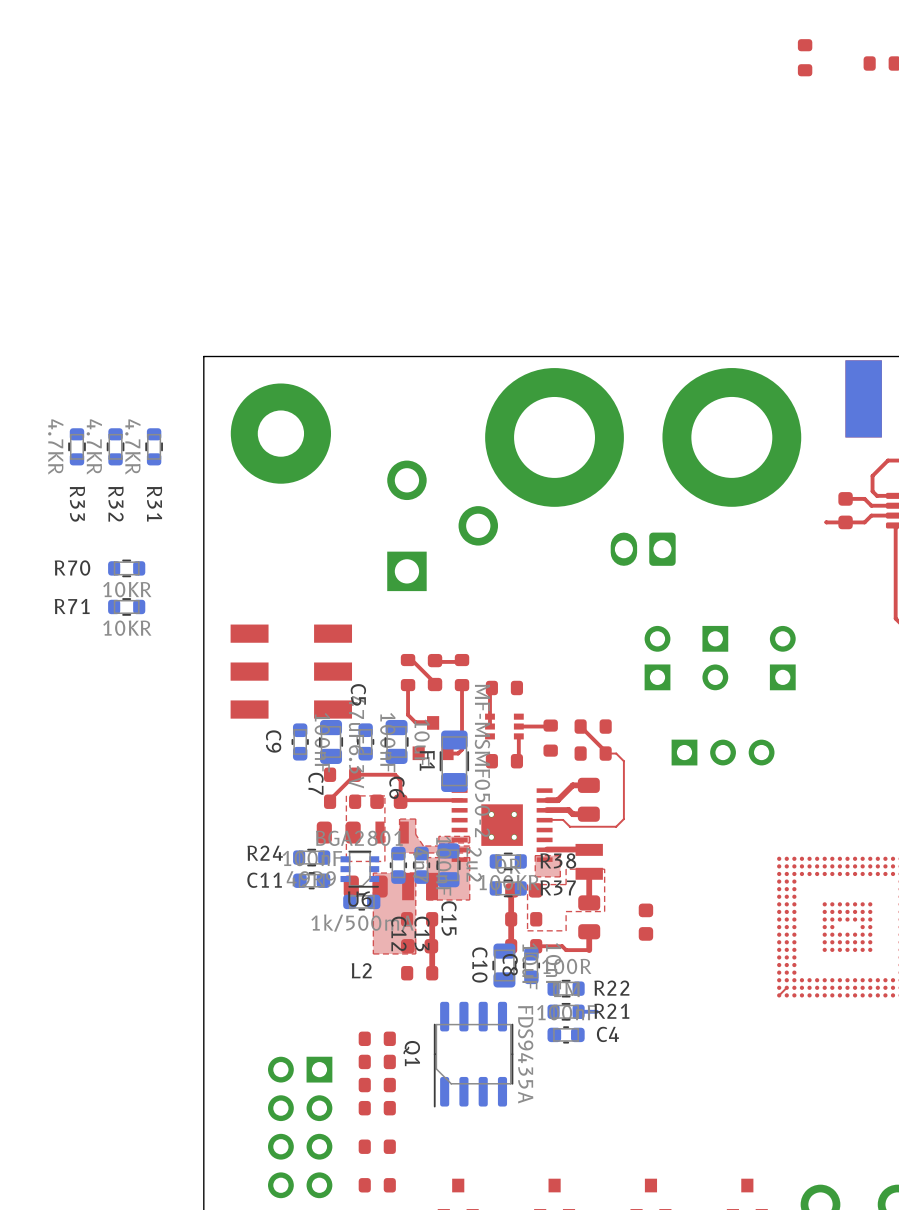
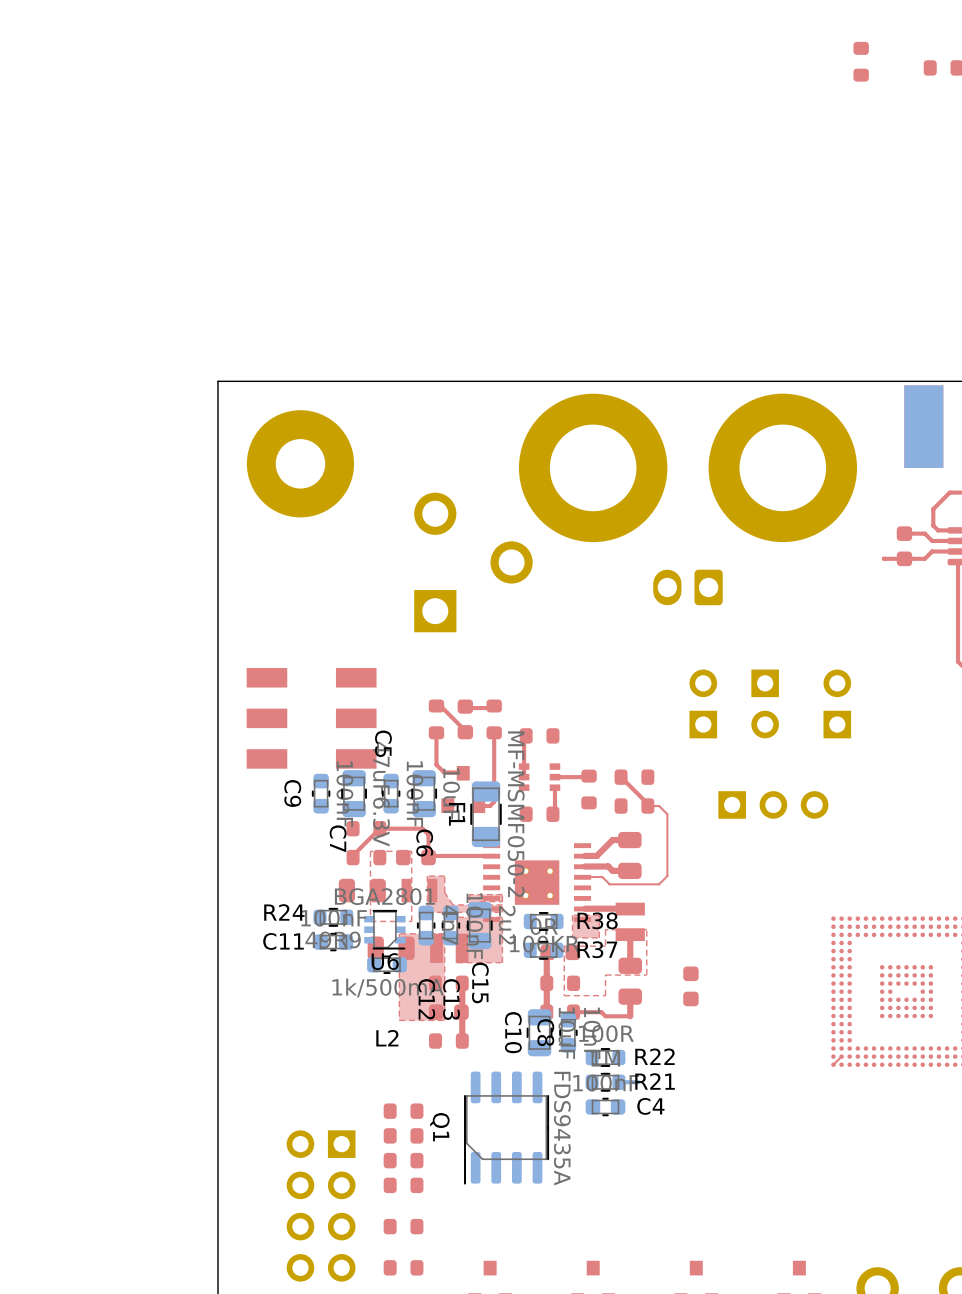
R33: 4.7KR (77, 446) -> none
R32: 4.7KR (115, 446) -> none
R31: 4.7KR (154, 446) -> none
R70: 10KR (126, 568) -> none
R71: 10KR (126, 606) -> none

